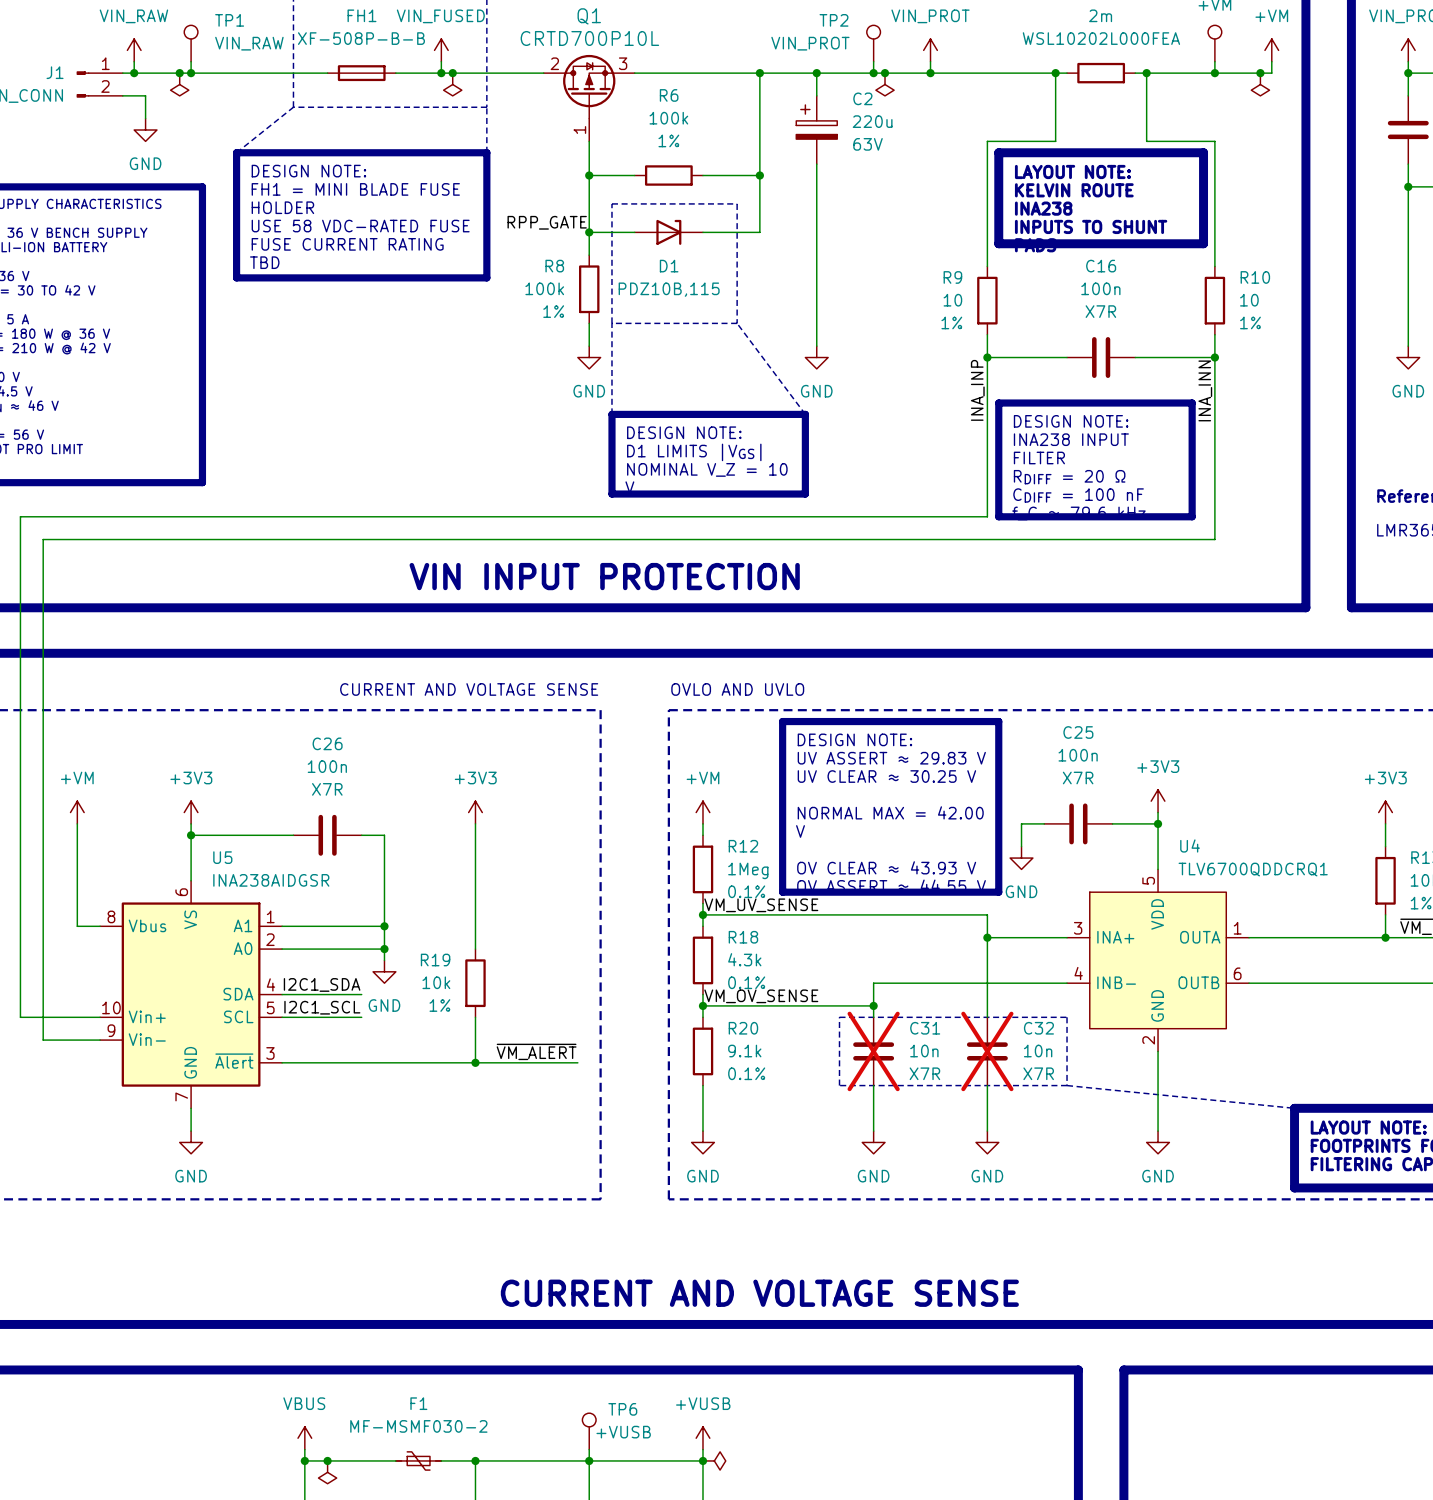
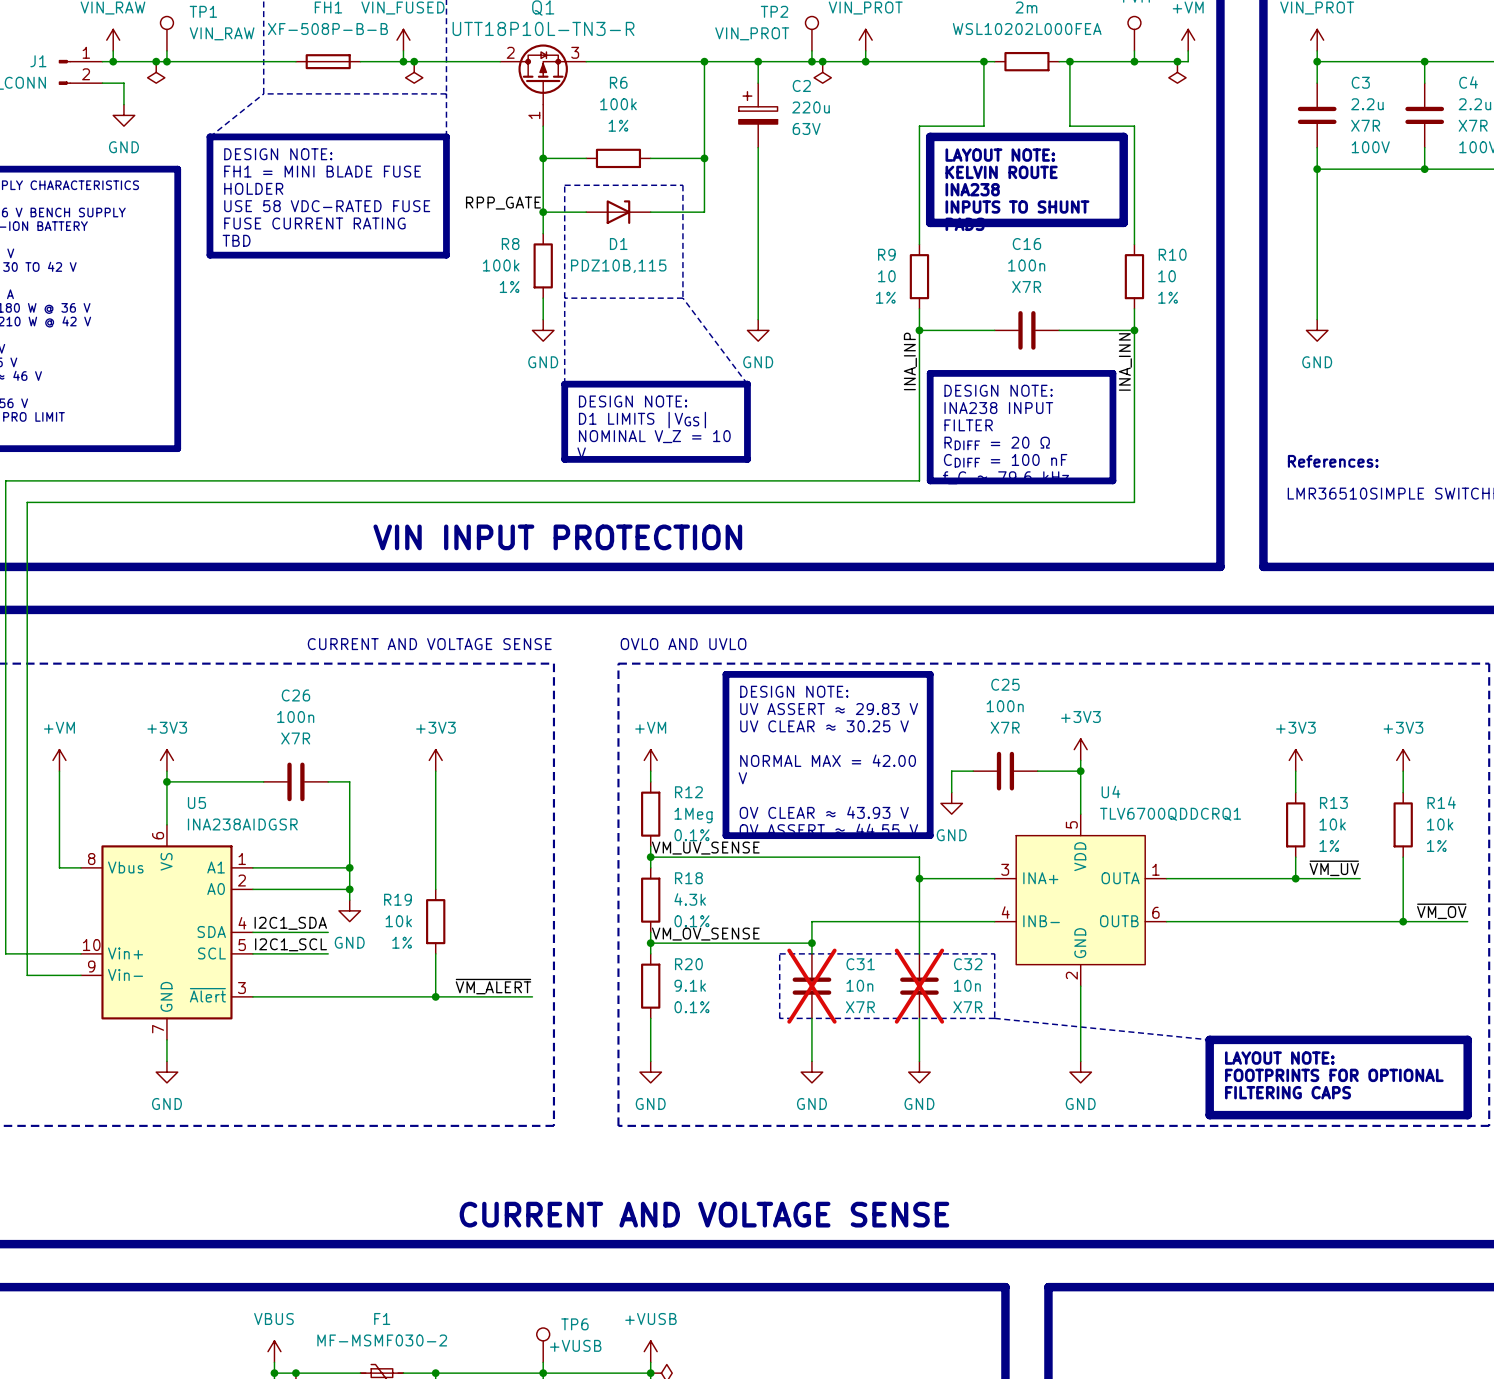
Q1 value: CRTD700P10L (589, 38) -> UTT18P10L-TN3-R (543, 28)

